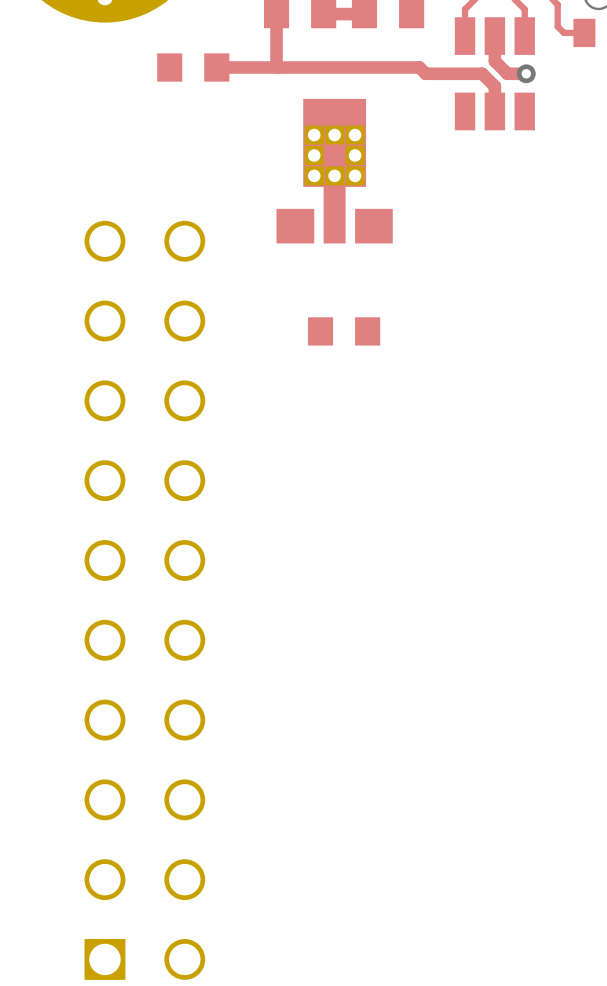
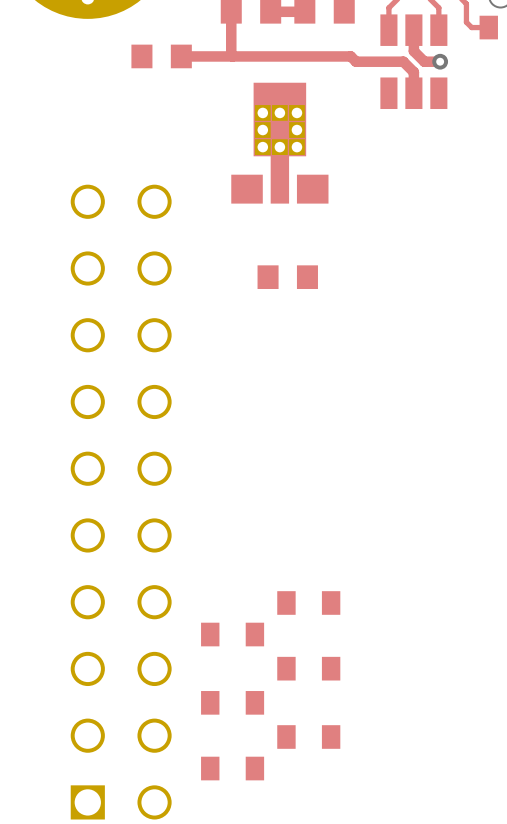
part: none -> (308, 602)
part: none -> (232, 634)
part: none -> (308, 668)
part: none -> (232, 702)
part: none -> (308, 737)
part: none -> (232, 768)

